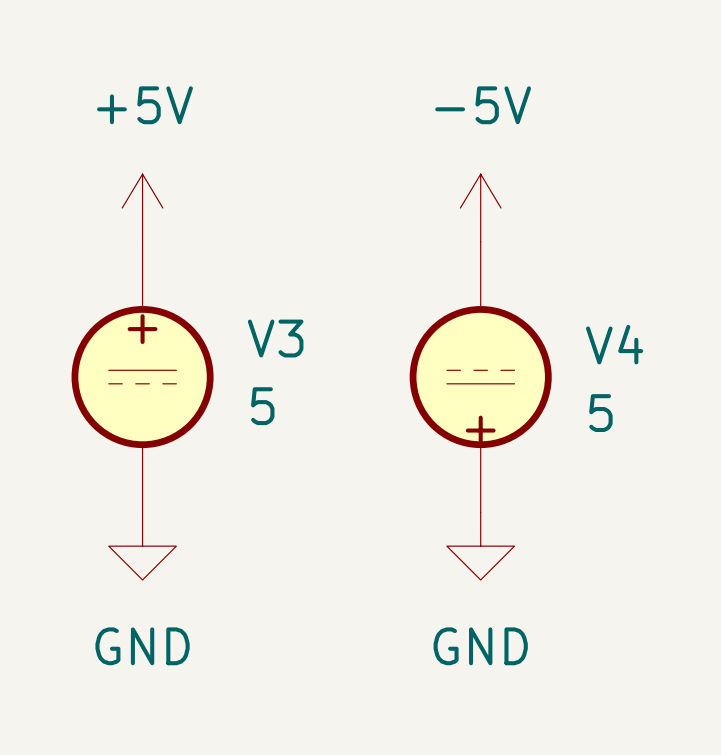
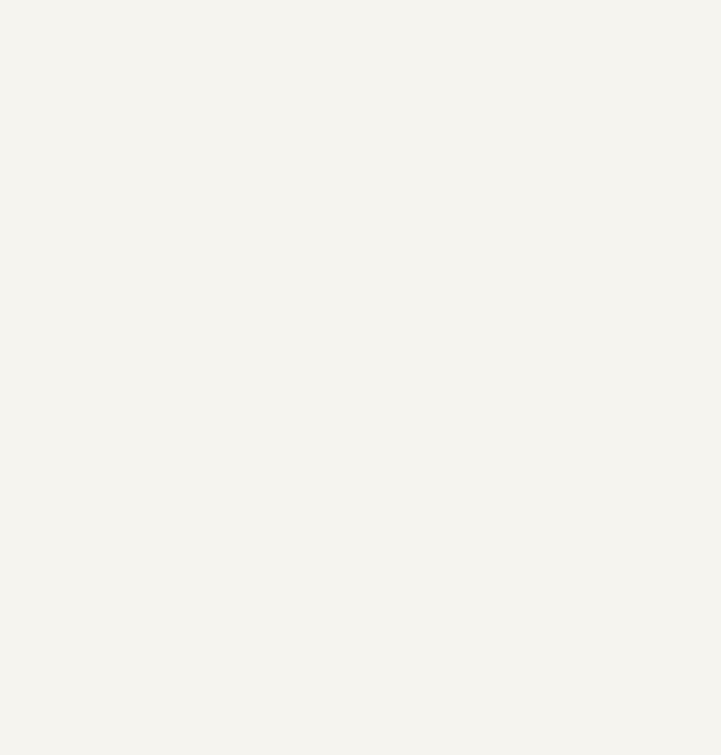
power symbol: +5V (142, 207) -> none
power symbol: -5V (480, 207) -> none
V3: 5 (142, 377) -> none
V4: 5 (480, 377) -> none
power symbol: GND (142, 546) -> none
power symbol: GND (480, 546) -> none

